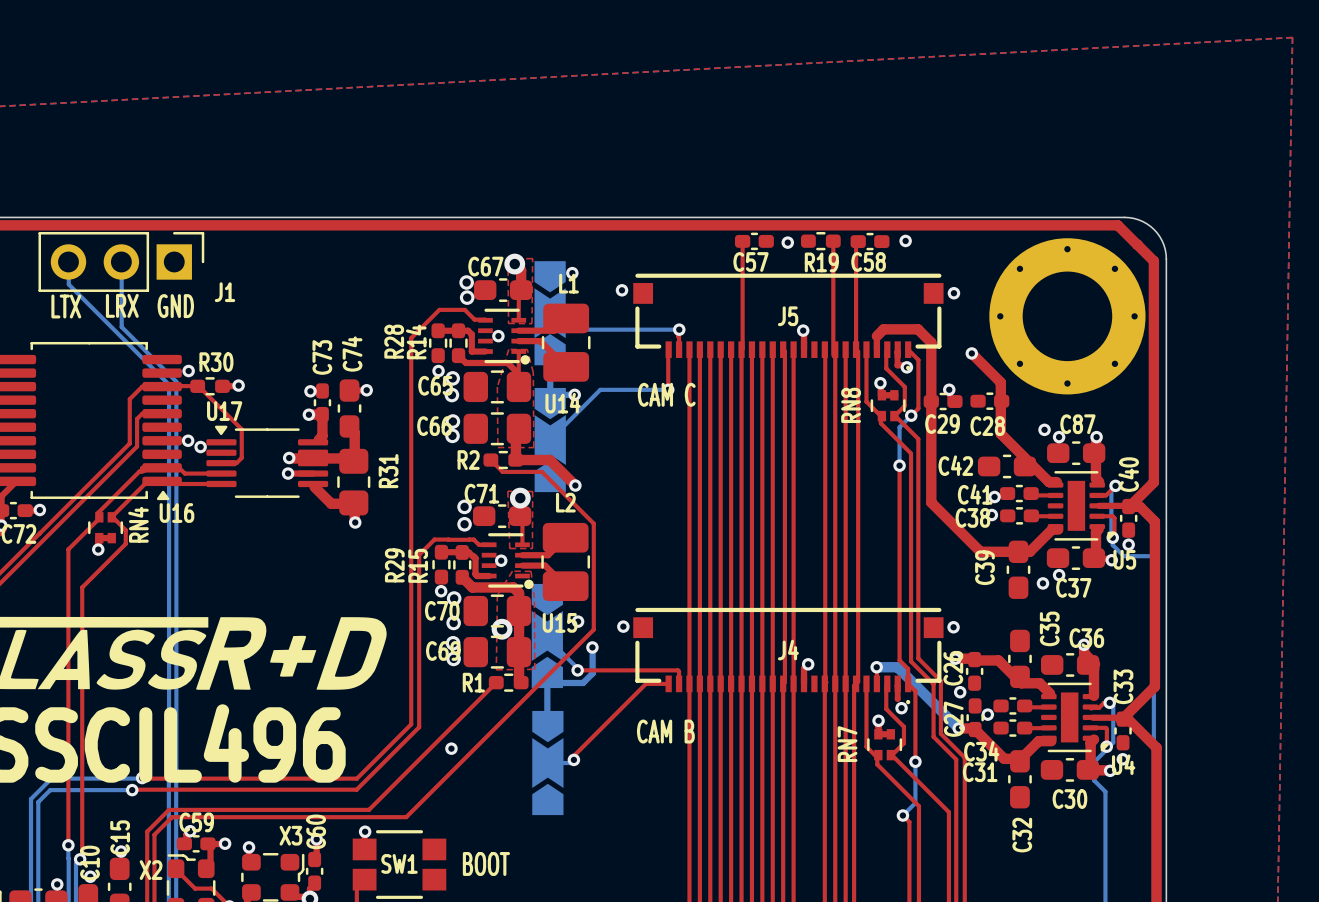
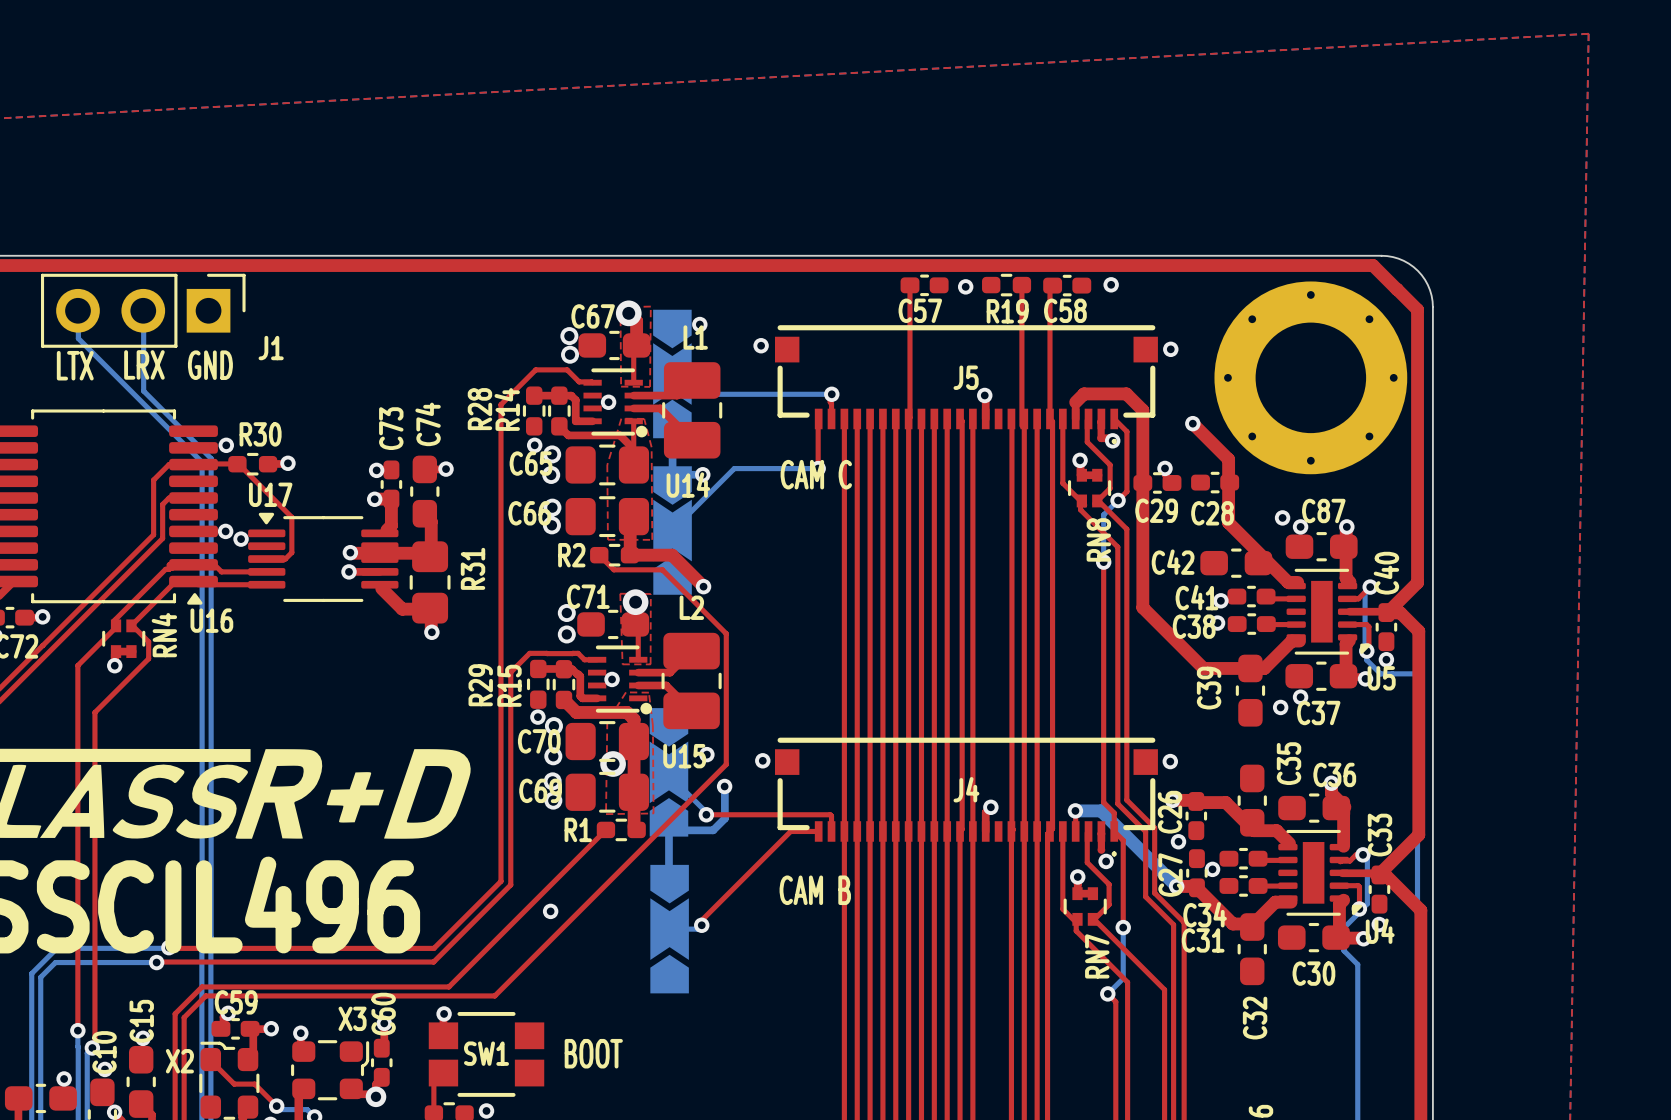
RN8 name position: RN8 (851, 405) -> RN8 (1098, 539)
RN7 name position: RN7 (847, 744) -> RN7 (1097, 956)

